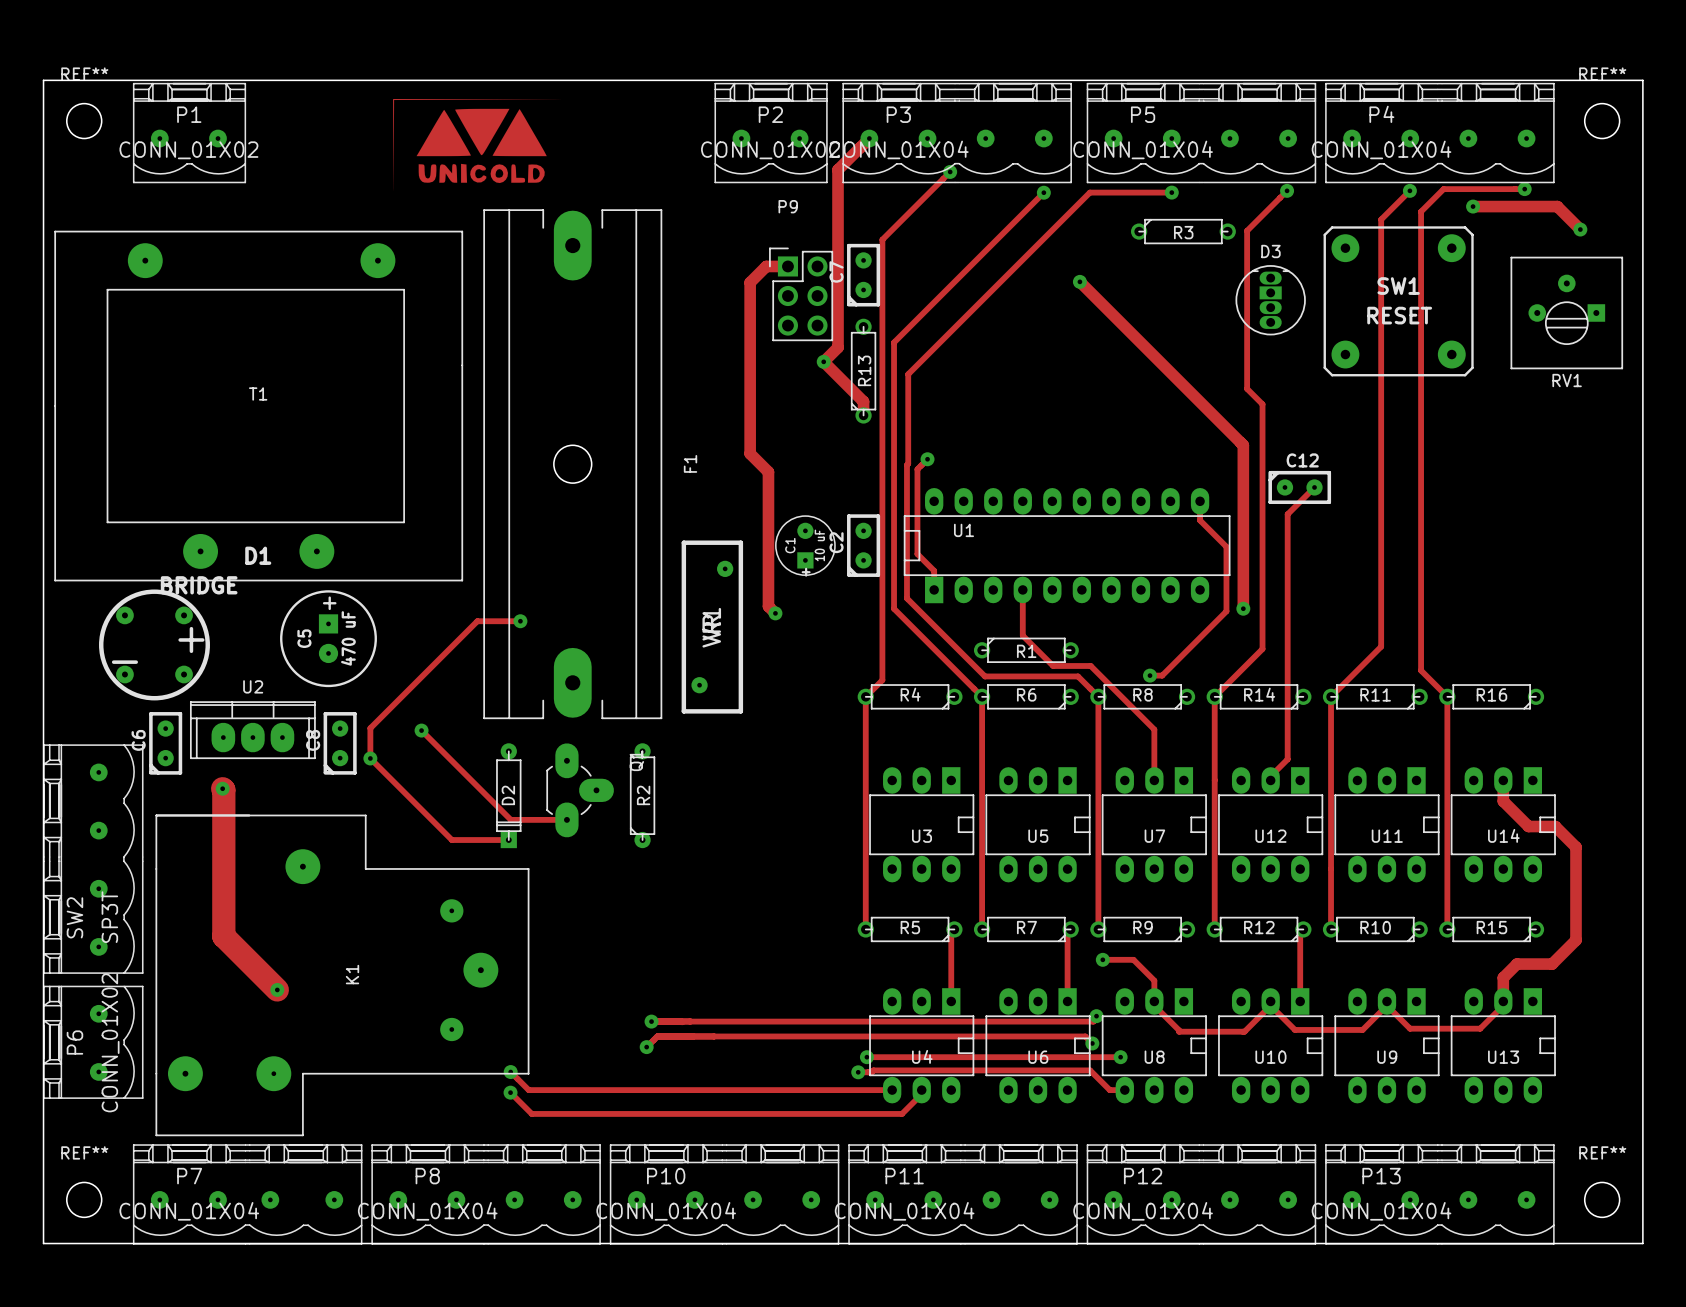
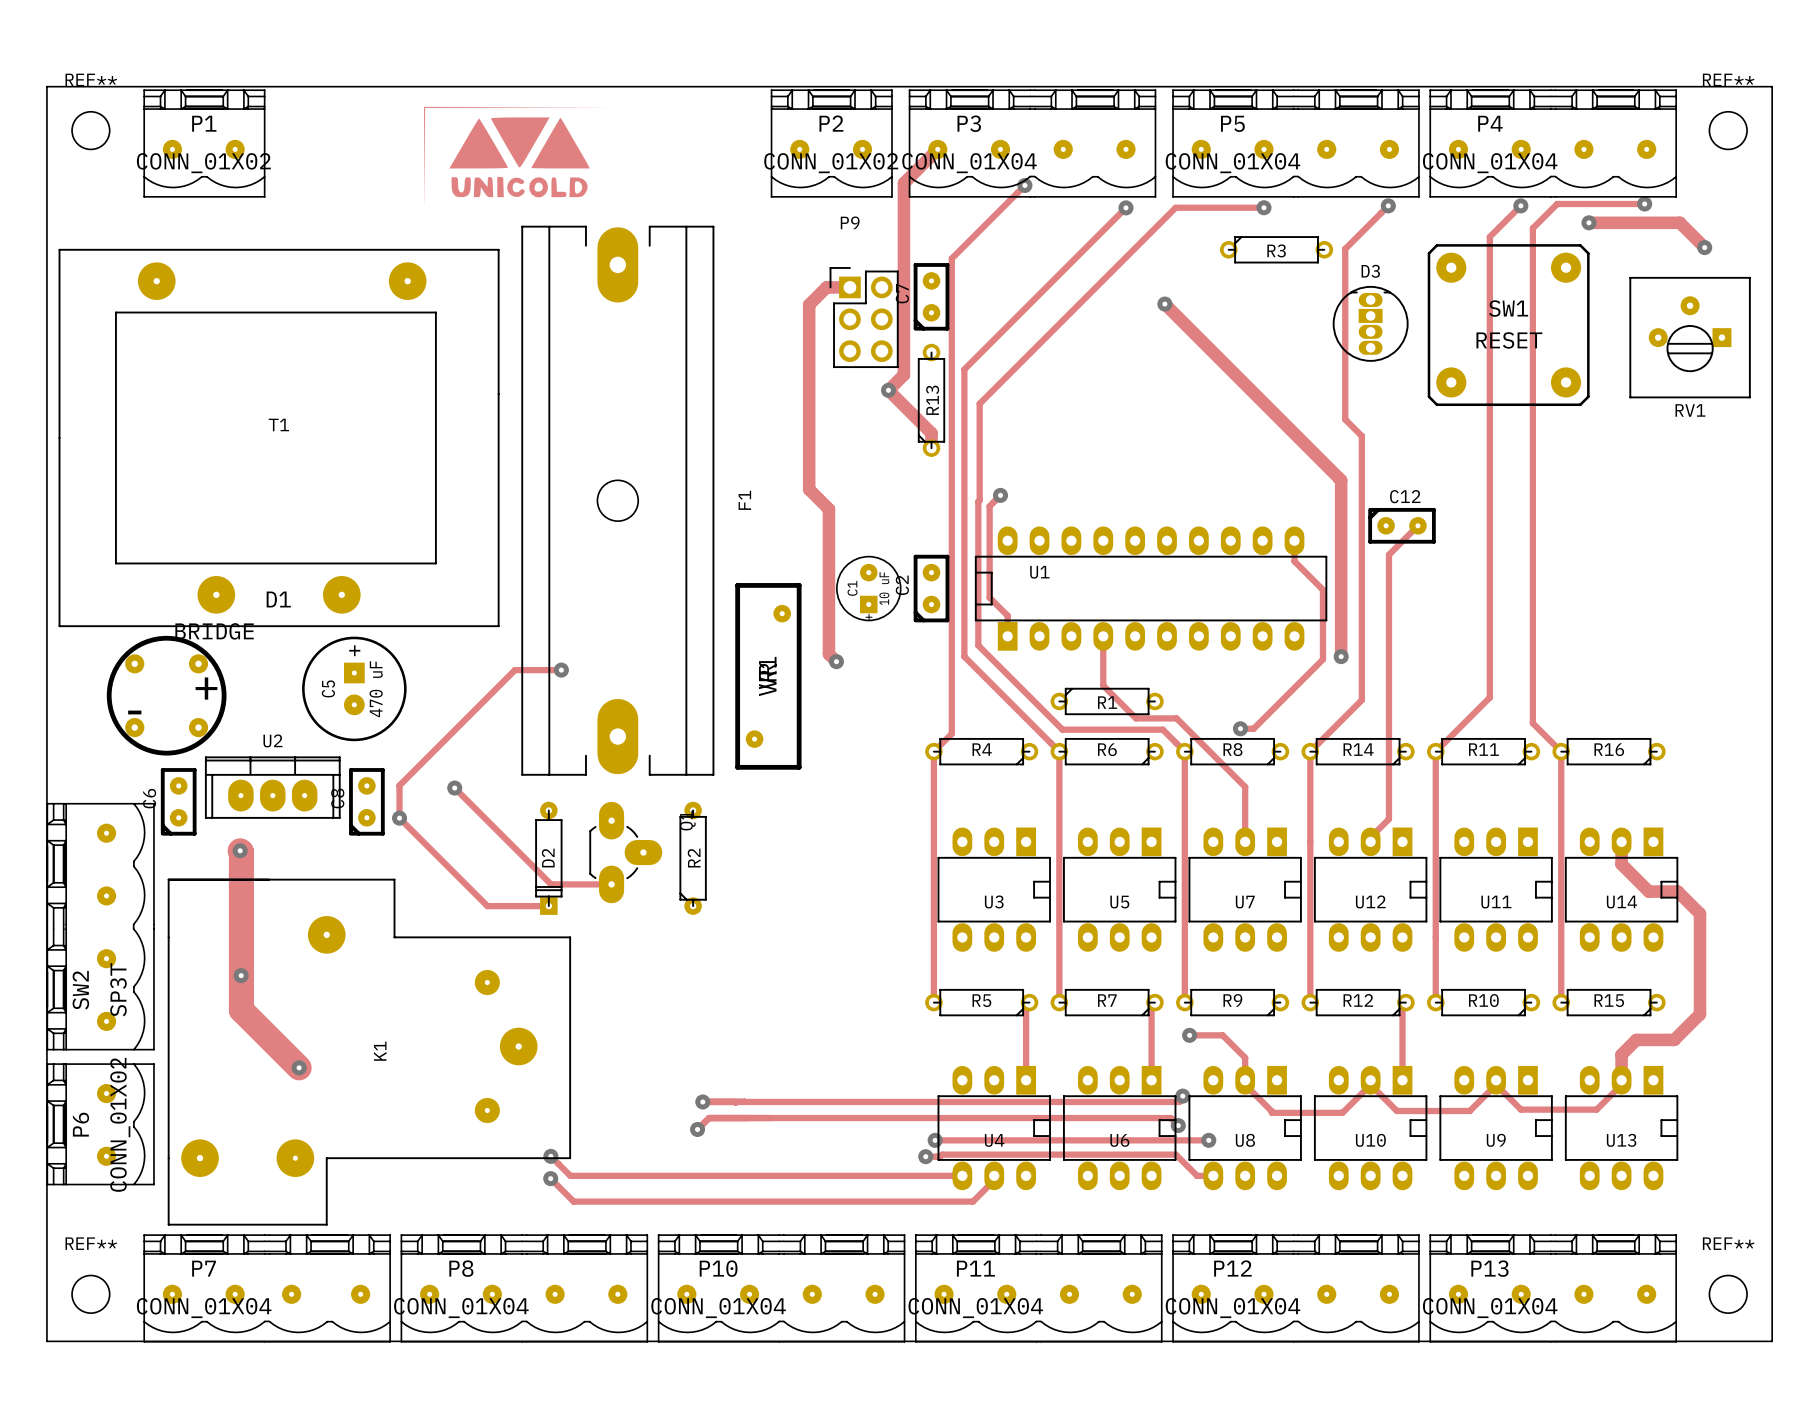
via: none -> (241, 975)

